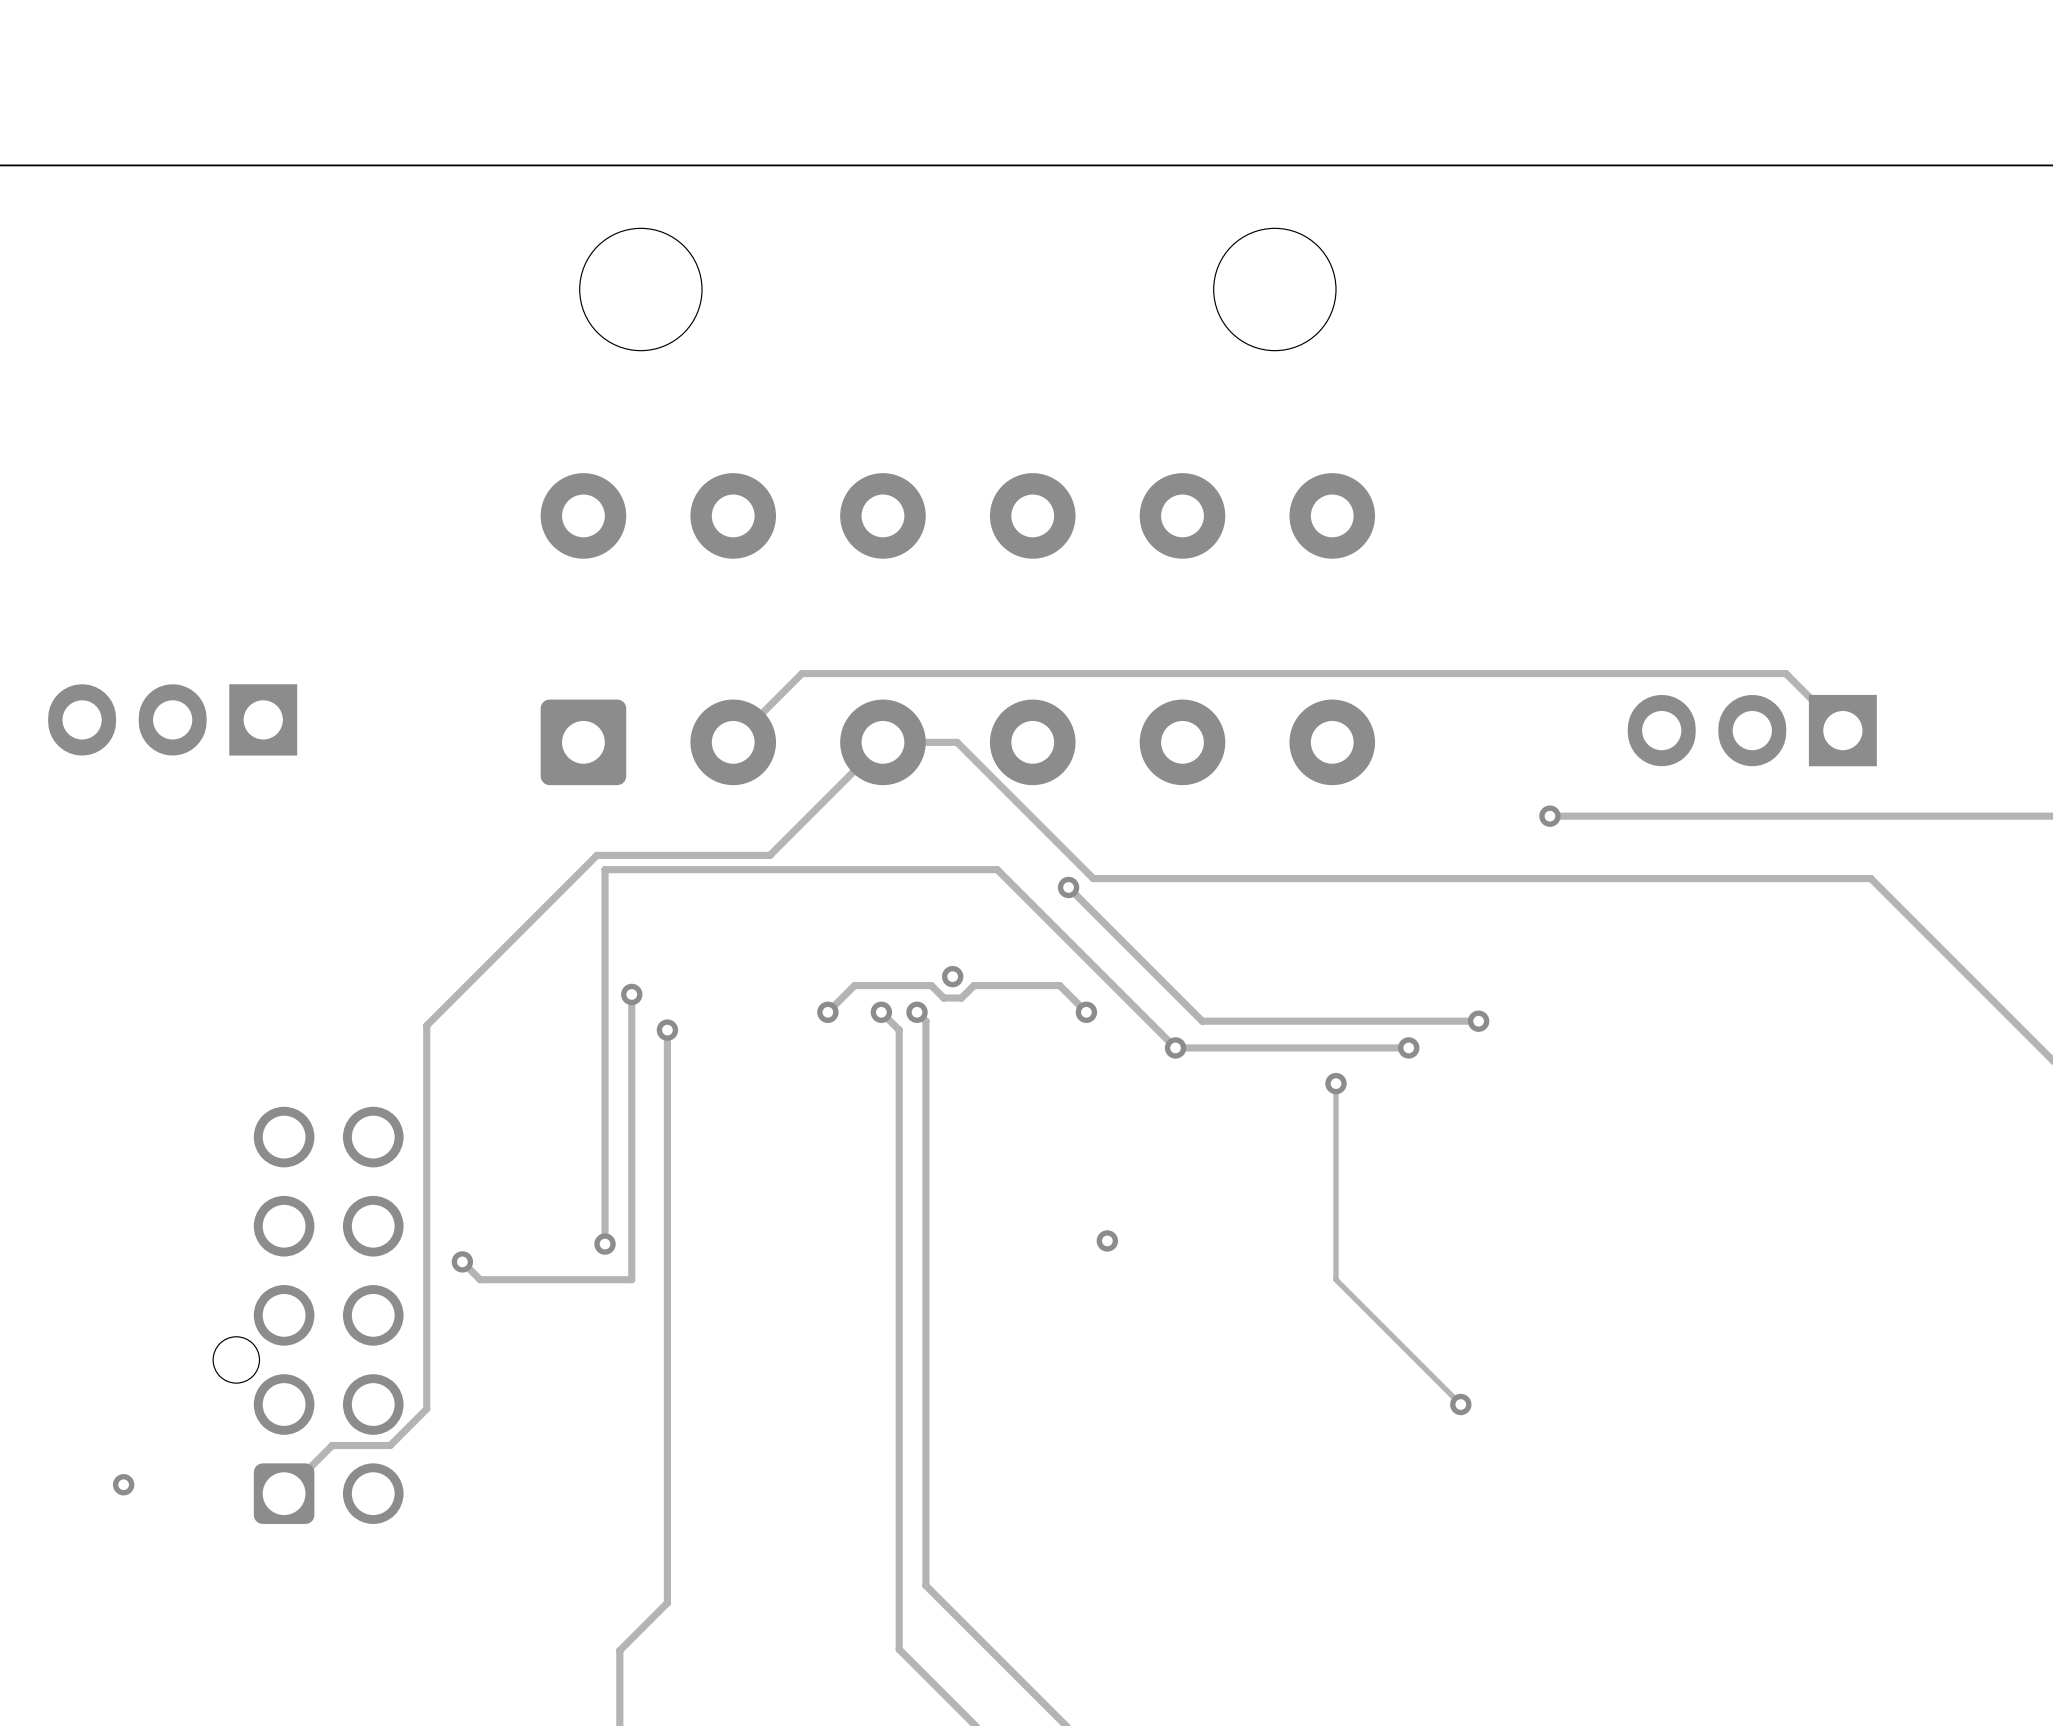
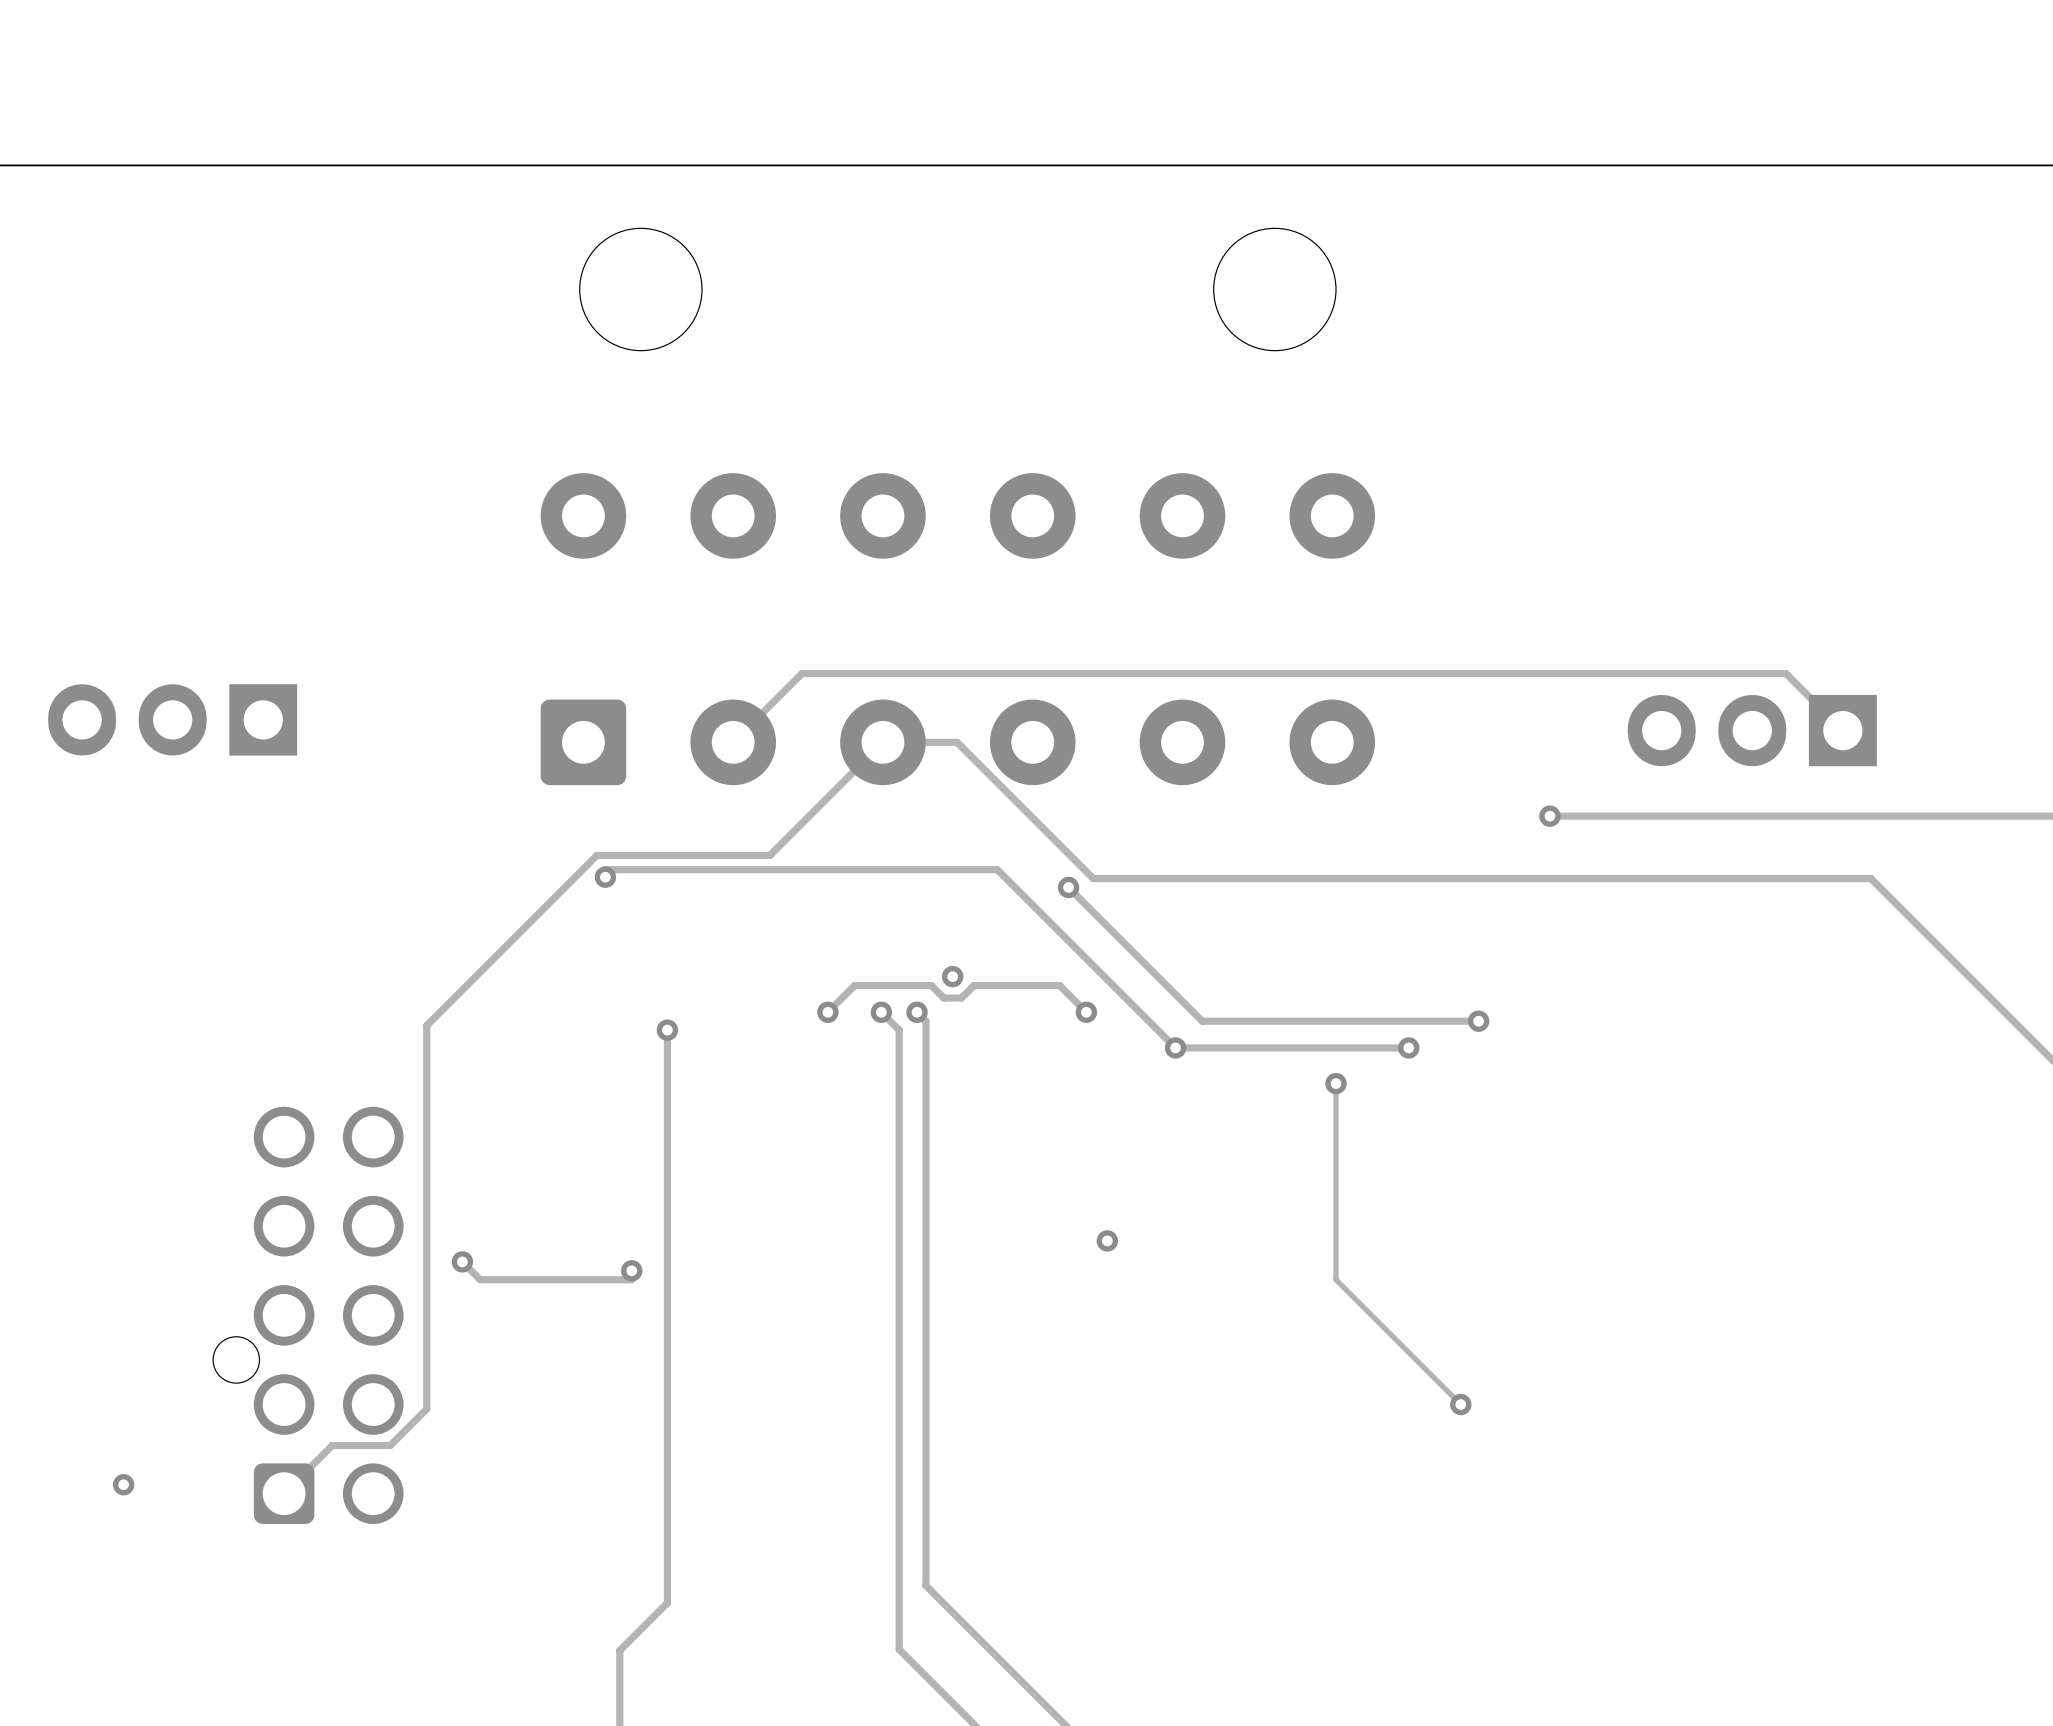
track: (605, 876) (605, 1244) -> none
track: (631, 994) (631, 1270) -> none
via position: (631, 994) -> (605, 877)
via position: (605, 1244) -> (631, 1270)

